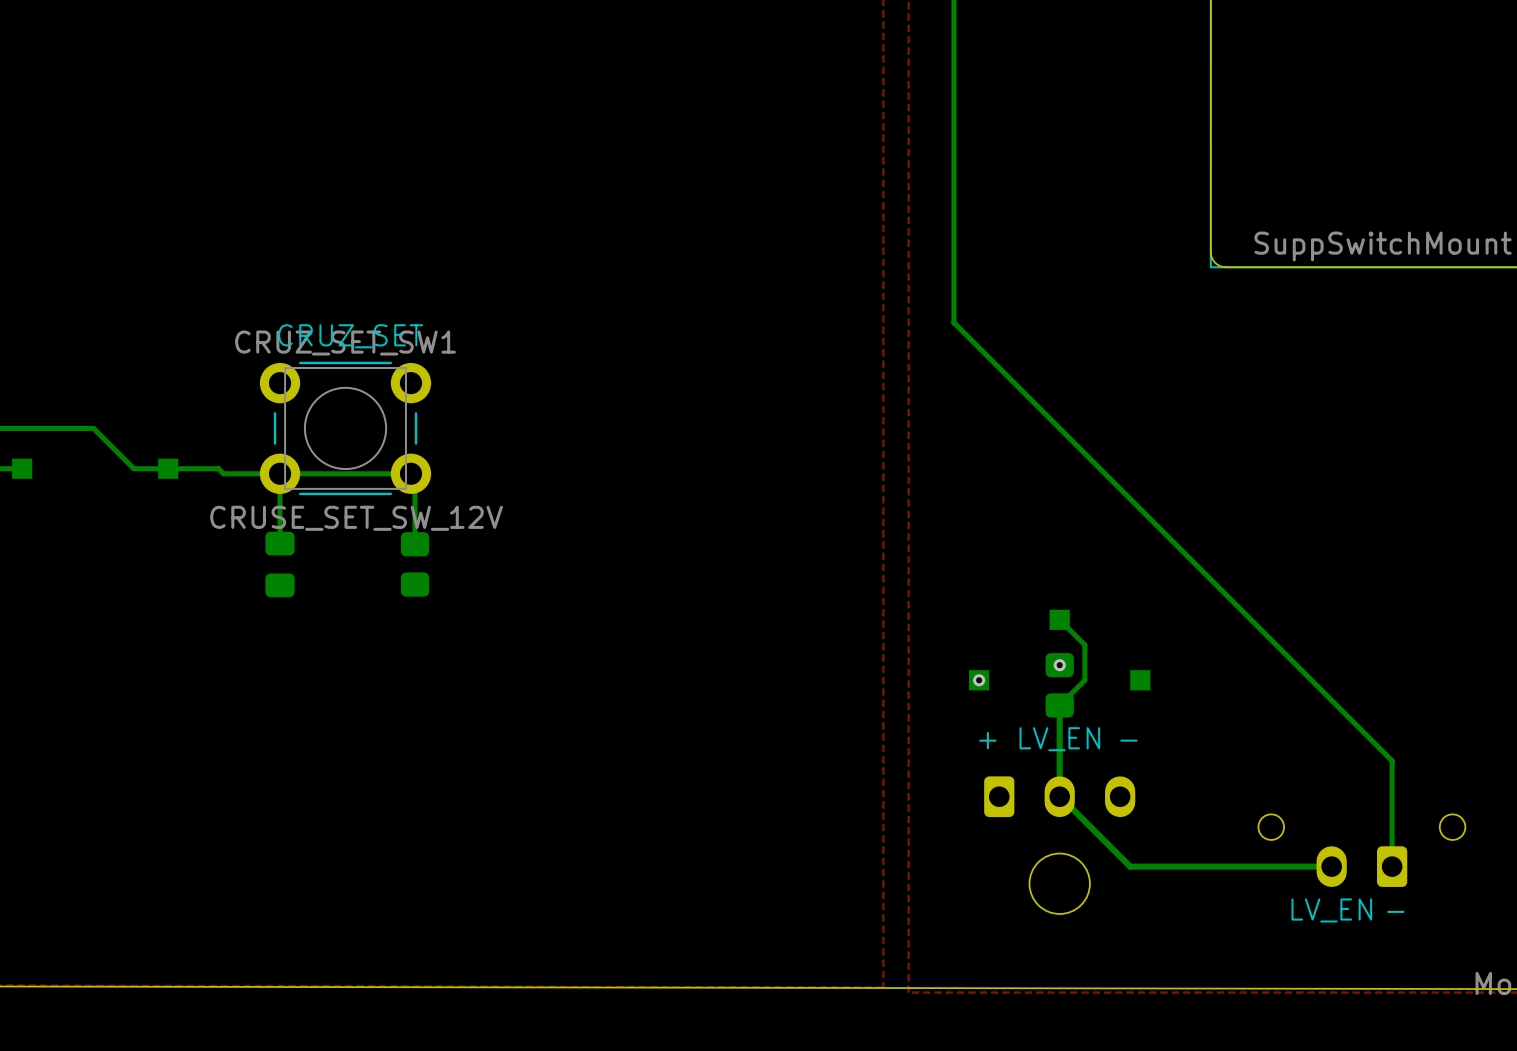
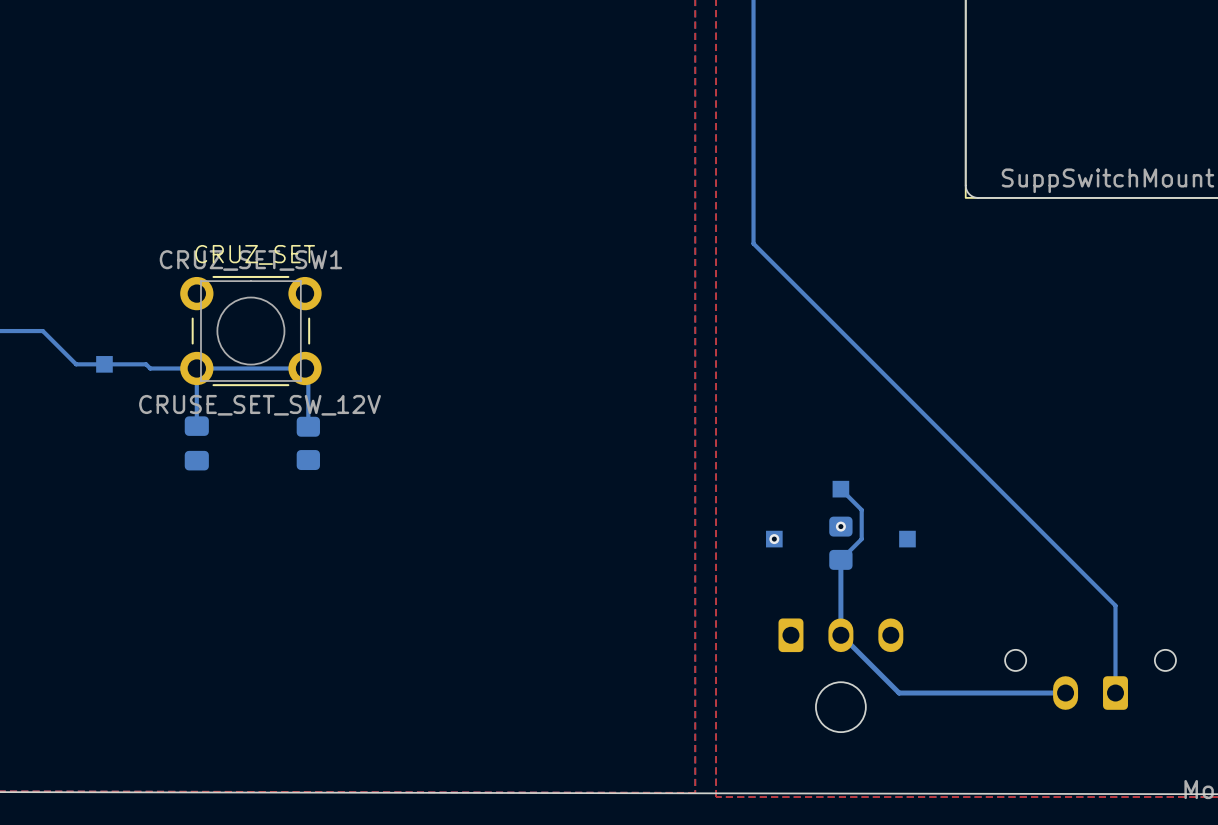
text: LV_EN (1059, 739) -> none
text: + (987, 740) -> none
text: - (1128, 740) -> none
text: LV_EN (1331, 910) -> none
text: - (1395, 911) -> none

